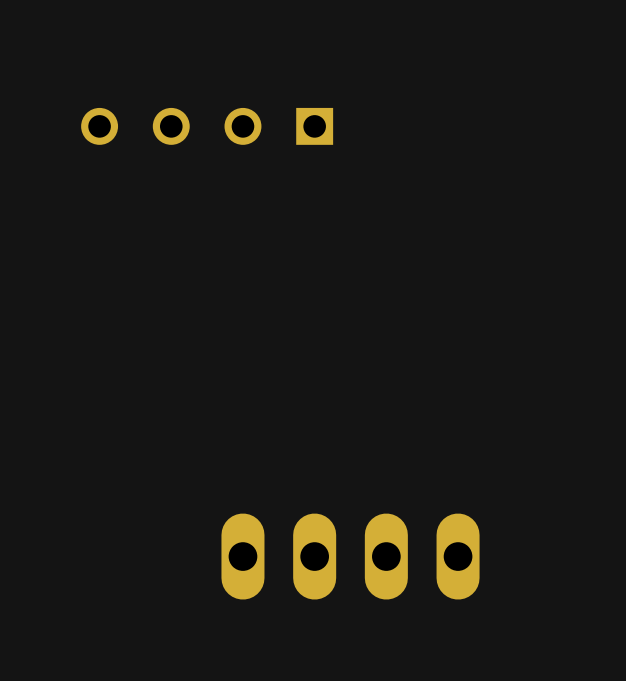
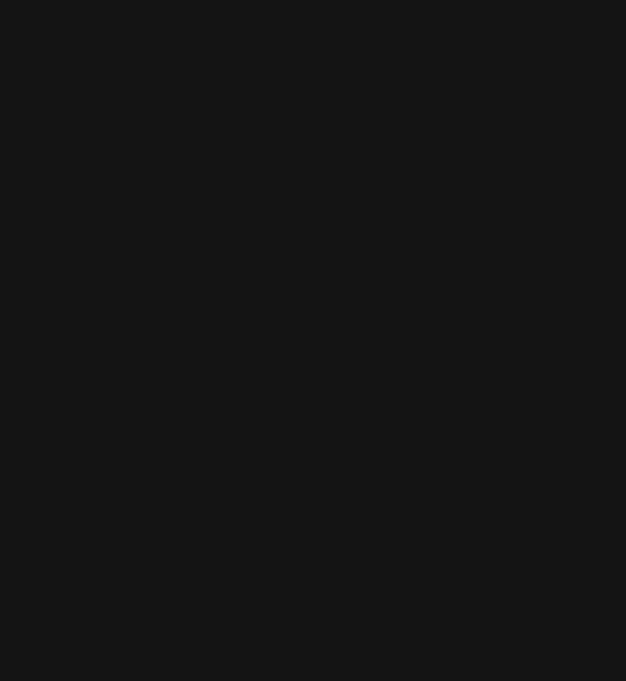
part: (207, 126) -> none
part: (350, 556) -> none

